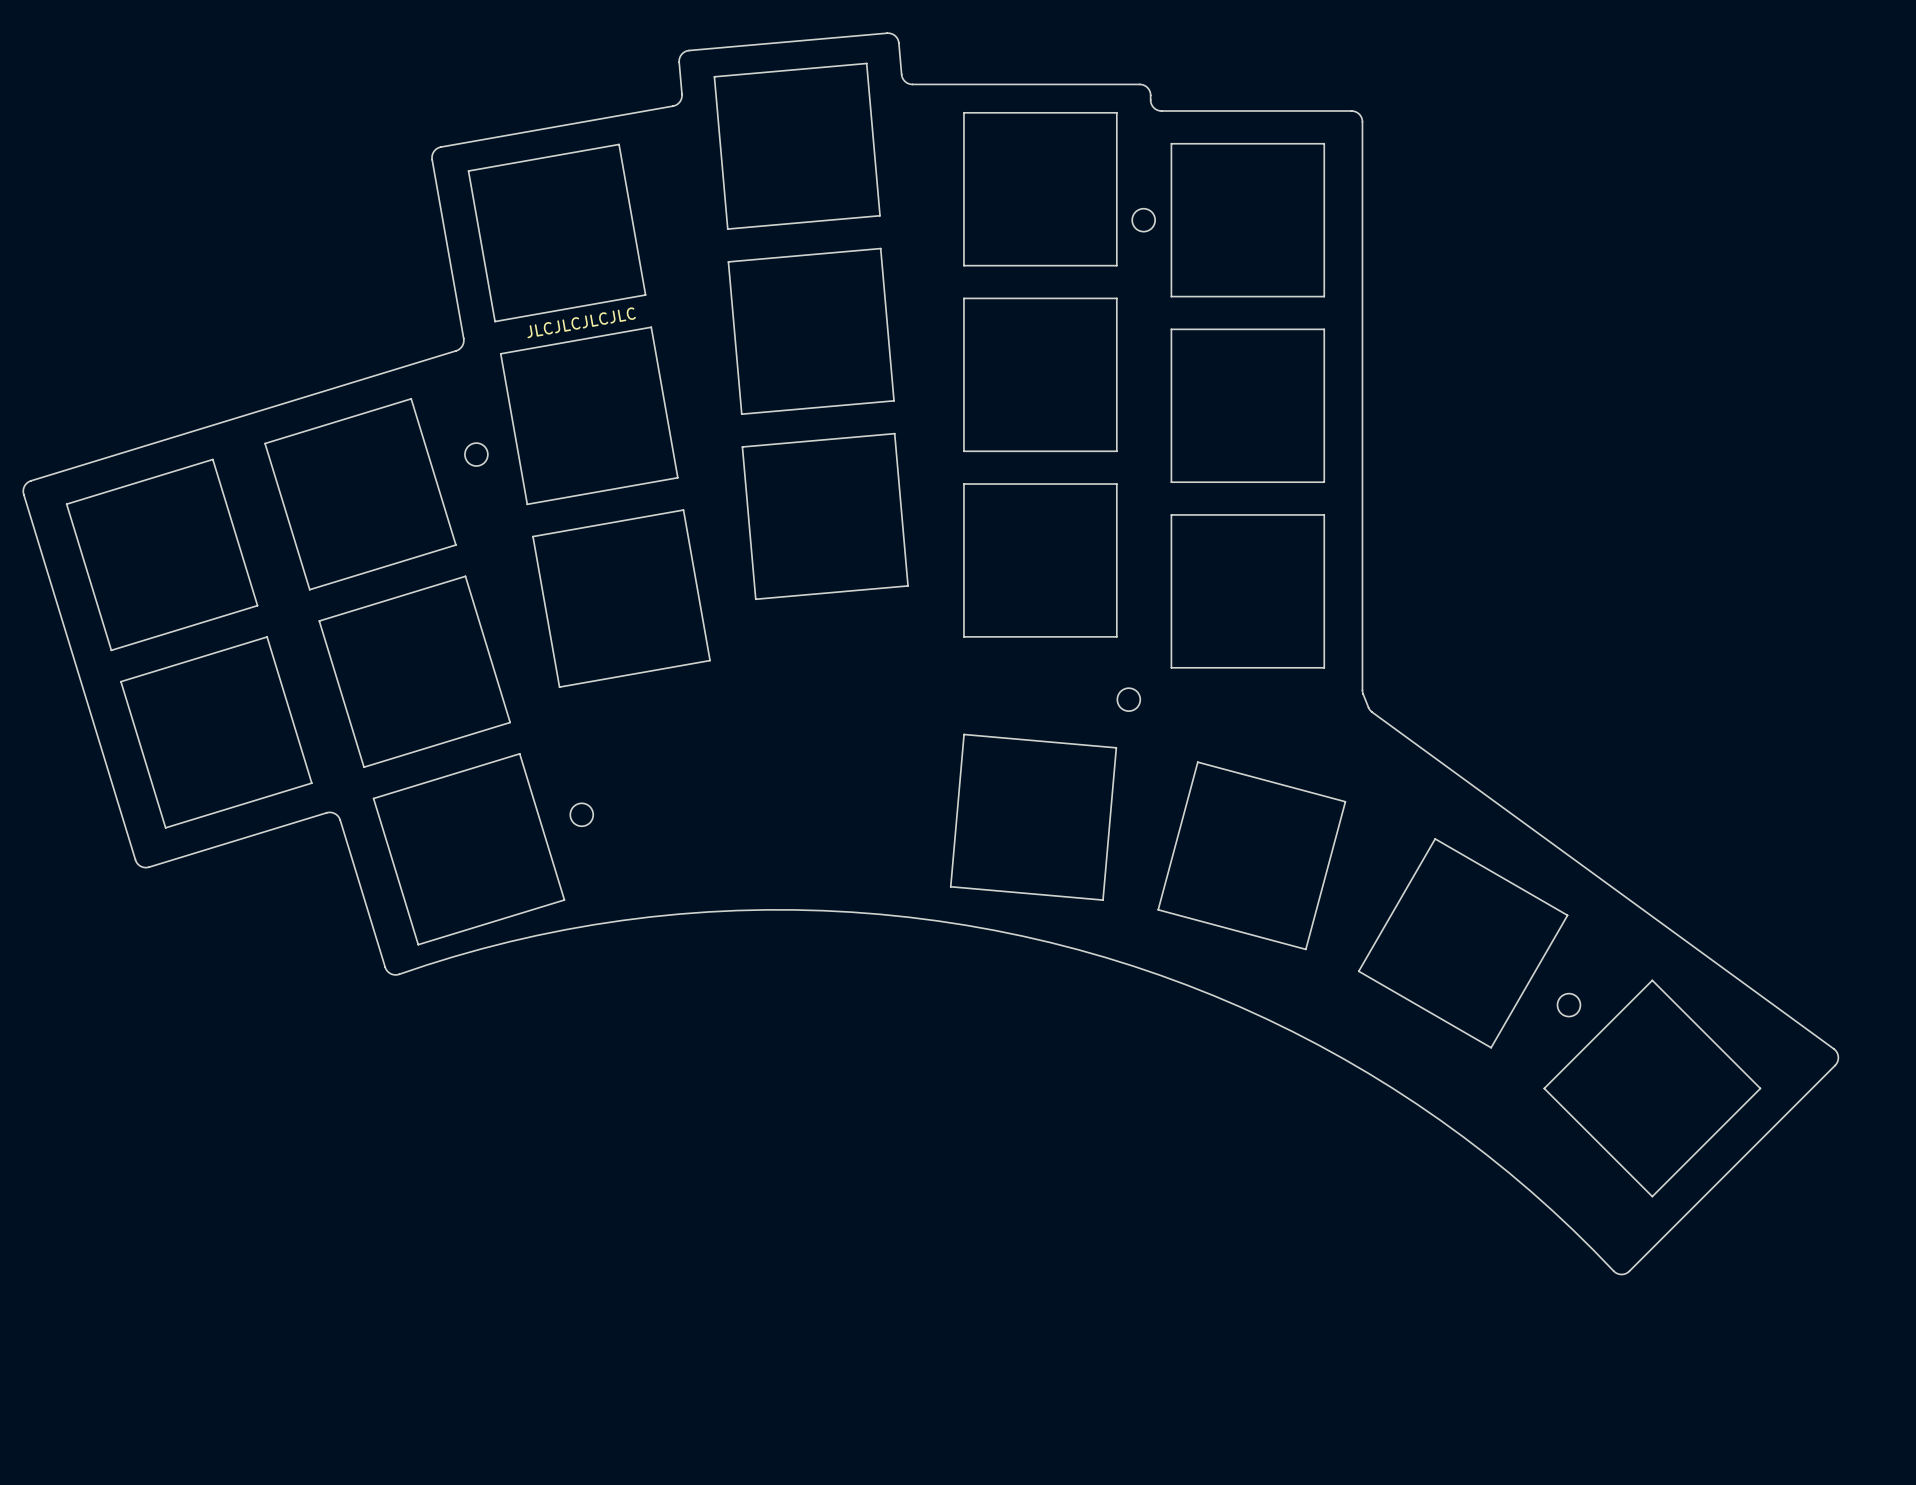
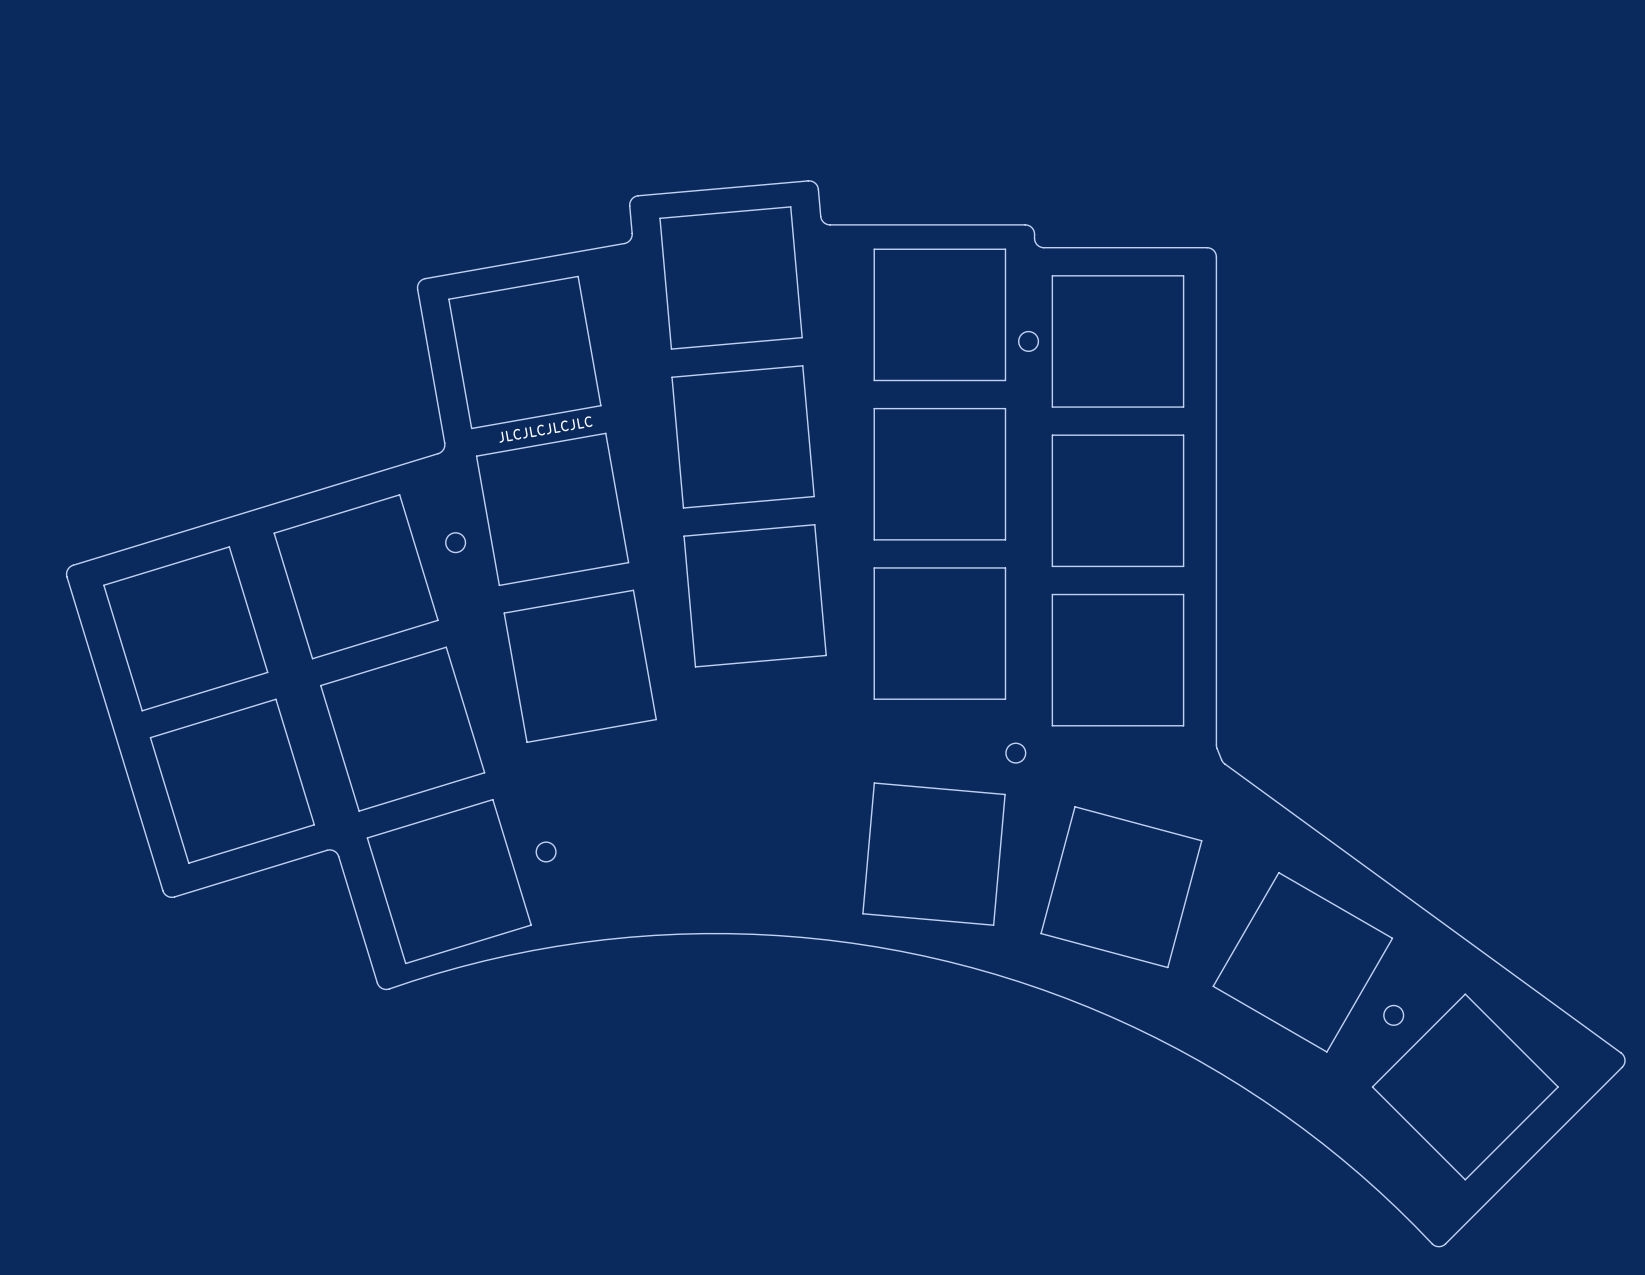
board edge: (866, 63) (880, 215) (727, 229) (714, 76) (866, 63) -> (790, 206) (802, 337) (671, 349) (660, 218) (790, 206)
board edge: (963, 112) (963, 265) (1116, 265) (1116, 112) (963, 112) -> (874, 249) (874, 380) (1005, 380) (1005, 249) (874, 249)
board edge: (1171, 143) (1171, 296) (1324, 296) (1324, 143) (1171, 143) -> (1052, 275) (1052, 407) (1183, 407) (1183, 275) (1052, 275)
board edge: (619, 144) (645, 295) (495, 321) (468, 171) (619, 144) -> (578, 276) (600, 405) (471, 428) (448, 299) (578, 276)
round board edge: [1131, 207, 1156, 233] -> none
board edge: (880, 248) (894, 400) (741, 414) (728, 261) (880, 248) -> (802, 365) (814, 496) (683, 507) (672, 377) (802, 365)
board edge: (963, 298) (963, 451) (1116, 451) (1116, 298) (963, 298) -> (874, 408) (874, 539) (1005, 539) (1005, 408) (874, 408)
text position: JLCJLCJLCJLC (581, 322) -> JLCJLCJLCJLC (546, 429)
board edge: (651, 327) (677, 477) (527, 504) (500, 353) (651, 327) -> (605, 433) (628, 562) (499, 585) (476, 456) (605, 433)
board edge: (1171, 329) (1171, 482) (1324, 482) (1324, 329) (1171, 329) -> (1052, 435) (1052, 566) (1183, 566) (1183, 435) (1052, 435)
round board edge: none -> [1018, 330, 1040, 352]
board edge: (894, 433) (908, 585) (755, 599) (742, 446) (894, 433) -> (814, 524) (826, 655) (695, 666) (684, 536) (814, 524)
round board edge: [464, 442, 489, 467] -> none
board edge: (963, 484) (1116, 484) (1116, 636) (963, 636) (963, 484) -> (874, 567) (1005, 567) (1005, 699) (874, 699) (874, 567)
board edge: (683, 510) (710, 660) (559, 687) (532, 536) (683, 510) -> (633, 590) (656, 719) (527, 742) (504, 613) (633, 590)
board edge: (1171, 514) (1324, 514) (1324, 667) (1171, 667) (1171, 514) -> (1052, 594) (1183, 594) (1183, 725) (1052, 725) (1052, 594)
board edge: (455, 545) (411, 398) (265, 443) (309, 589) -> (221, 520) (265, 506)
board edge: none -> (391, 467) (439, 453) (444, 446) (417, 289) (419, 281) (425, 278) (626, 242) (632, 234) (629, 203) (631, 199) (637, 195) (810, 180) (817, 187) (821, 219) (828, 224) (1025, 224) (1032, 228) (1035, 242) (1042, 247) (1210, 248) (1215, 252) (1216, 257) (1216, 745) (1221, 760) (1621, 1053) (1624, 1058) (1624, 1064) (1445, 1243) (1436, 1246) (1379, 1191) (1322, 1143) (1283, 1114) (1221, 1073) (1156, 1038) (1089, 1007) (1019, 981) (948, 961) (876, 946) (802, 937) (728, 933) (679, 934) (605, 939) (532, 950) (460, 967) (388, 989) (383, 988) (377, 982) (338, 856) (333, 850) (327, 850) (174, 896) (165, 894) (116, 738)
board edge: (257, 605) (212, 459) (66, 504) (111, 650) -> (66, 576) (67, 570) (71, 566) (95, 558)
round board edge: none -> [445, 532, 467, 554]
board edge: (78, 671) (23, 494) (25, 484) (31, 480) (459, 349) (463, 343) (463, 338) (432, 158) (433, 152) (438, 147) (675, 105) (679, 102) (682, 95) (679, 58) (682, 53) (687, 50) (887, 33) (892, 34) (897, 39) (902, 77) (906, 82) (911, 84) (1140, 84) (1148, 88) (1151, 104) (1160, 110) (1354, 111) (1360, 115) (1362, 121) (1362, 690) (1368, 708) (1833, 1048) (1837, 1054) (1838, 1059) (1835, 1065) (1629, 1271) (1620, 1274) (1614, 1271) (1573, 1230) (1508, 1172) (1463, 1137) (1392, 1088) (1318, 1044) (1266, 1019) (1160, 975) (1050, 942) (966, 925) (851, 912) (765, 909) (679, 914) (593, 924) (509, 941) (393, 974) (385, 967) (339, 818) (332, 812) (321, 814) -> none
round board edge: [1116, 687, 1142, 712] -> none
board edge: (964, 734) (1116, 747) (1103, 900) (950, 886) (964, 734) -> (874, 783) (1005, 794) (993, 925) (862, 913) (874, 783)
board edge: (1197, 762) (1345, 801) (1305, 949) (1158, 909) (1197, 762) -> (1075, 806) (1201, 840) (1167, 967) (1041, 933) (1075, 806)
round board edge: [569, 802, 595, 828] -> none
board edge: (1435, 838) (1567, 915) (1491, 1047) (1358, 971) (1435, 838) -> (1278, 872) (1392, 938) (1326, 1051) (1213, 986) (1278, 872)
board edge: (175, 859) (146, 867) (139, 865) (135, 859) -> (150, 737) (188, 863) (314, 824) (275, 699)
round board edge: none -> [1005, 742, 1027, 764]
board edge: none -> (492, 799) (367, 838) (405, 963) (531, 925) (492, 799)
round board edge: none -> [535, 841, 557, 863]
board edge: (1652, 980) (1760, 1088) (1652, 1196) (1544, 1088) (1652, 980) -> (1465, 994) (1558, 1086) (1465, 1179) (1372, 1086) (1465, 994)
round board edge position: (1568, 1005) -> (1393, 1015)

